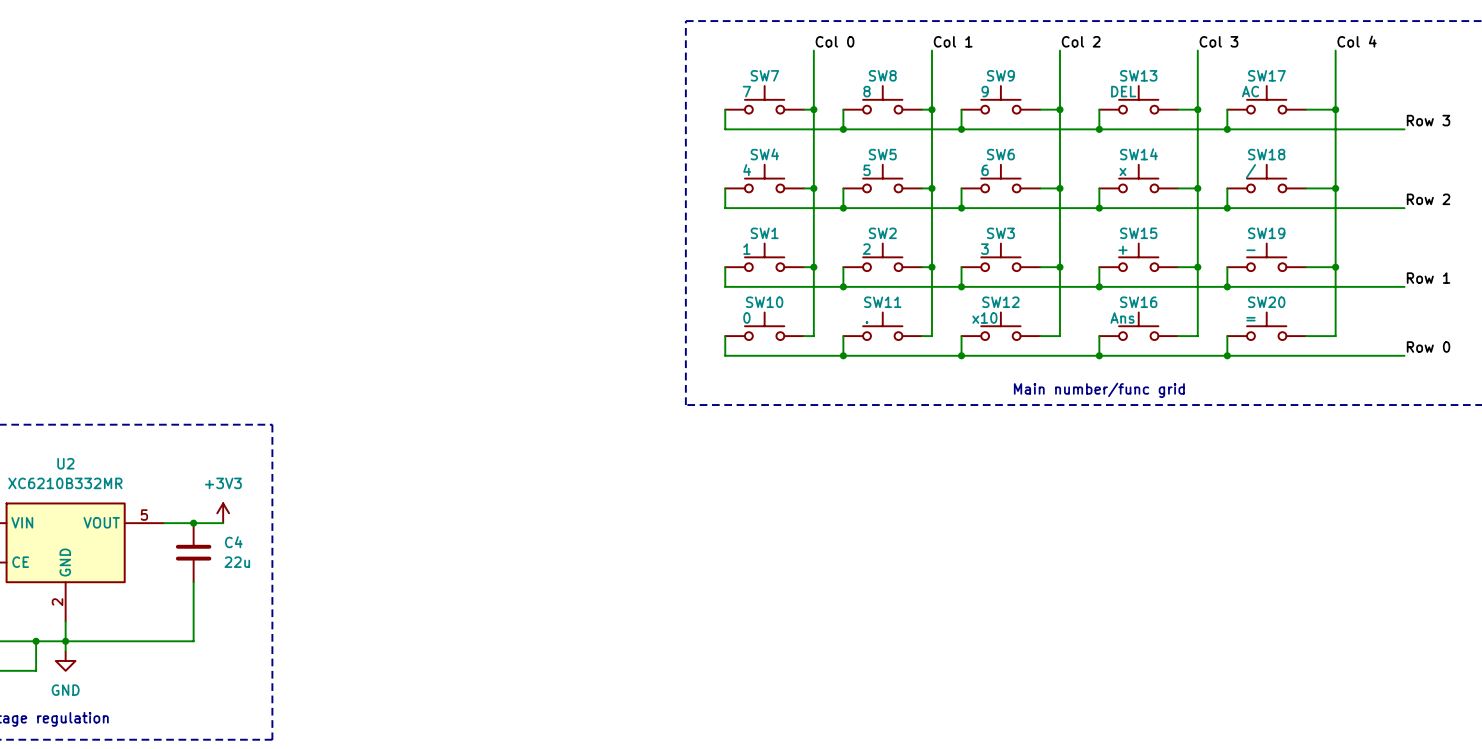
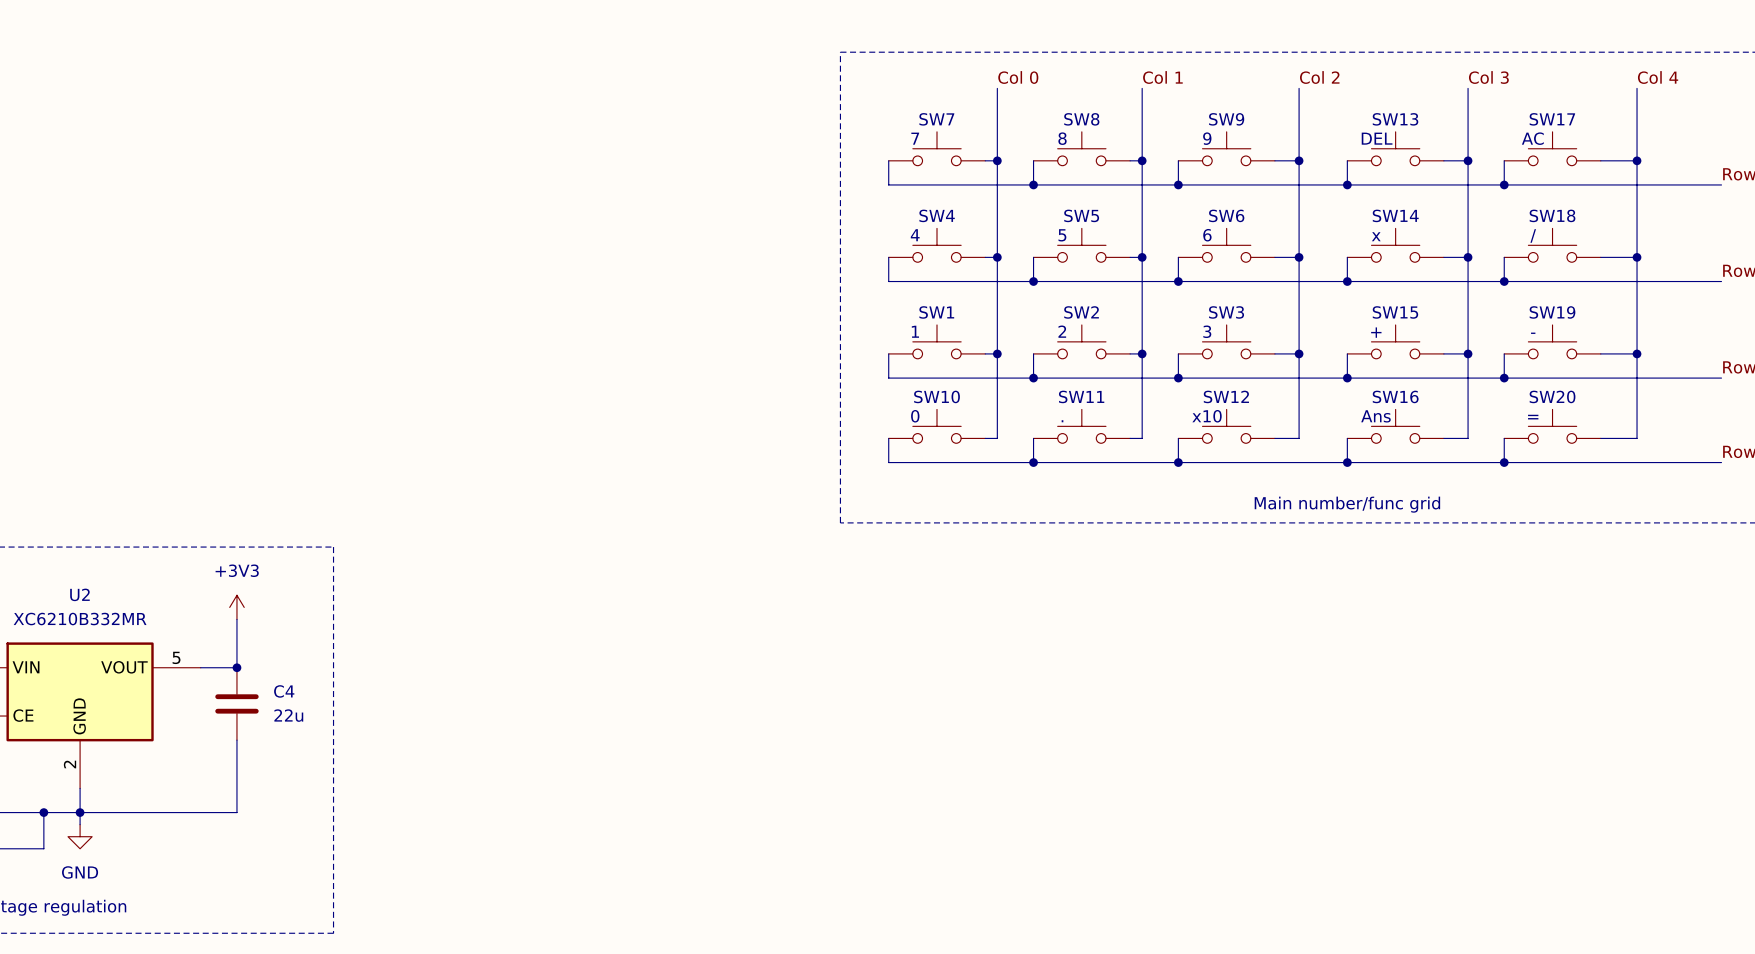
power symbol position: +3V3 (223, 513) -> +3V3 (236, 607)
wire: (193, 523) (223, 523) -> (236, 667) (236, 619)

